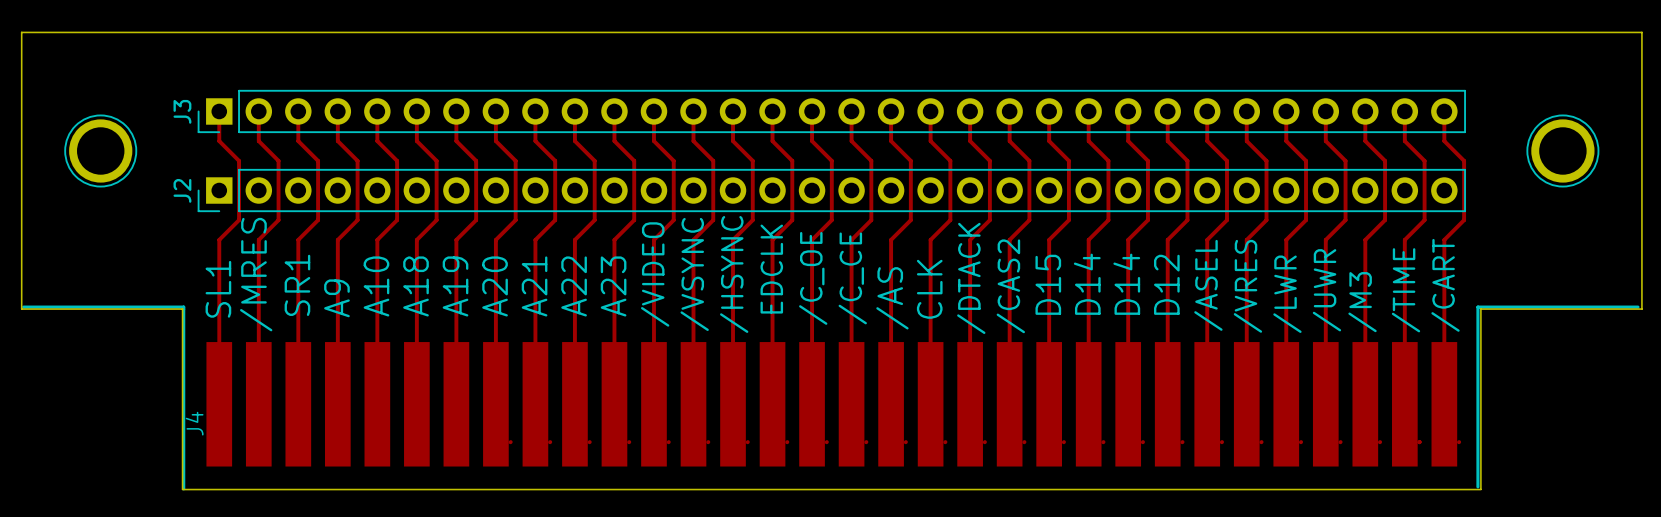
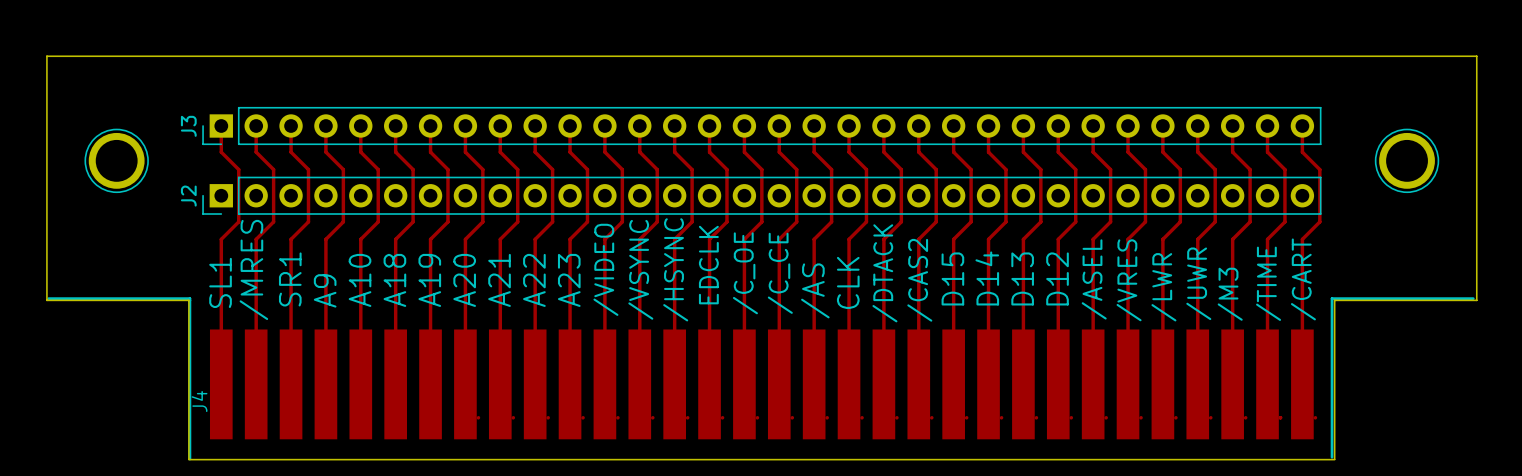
text: D14 (1126, 284) -> D13 (1022, 278)

